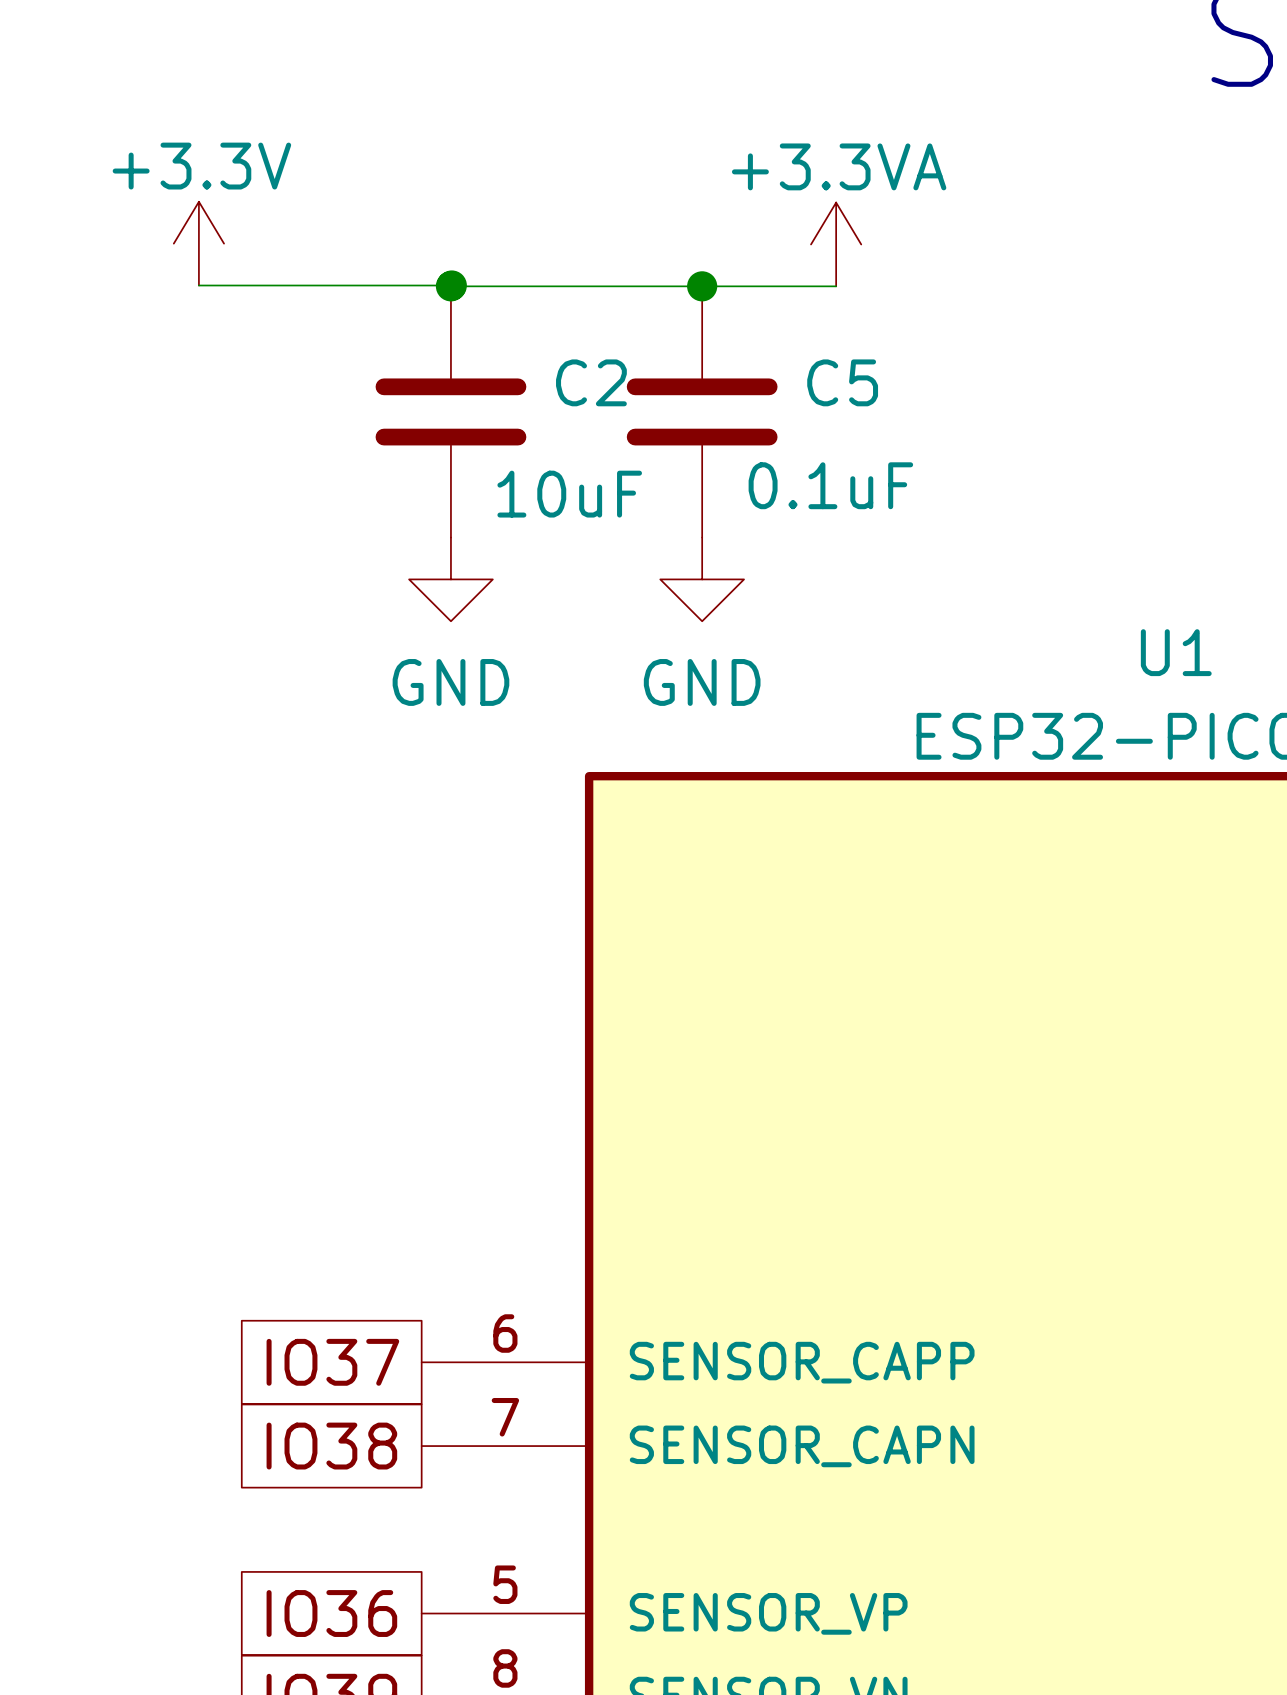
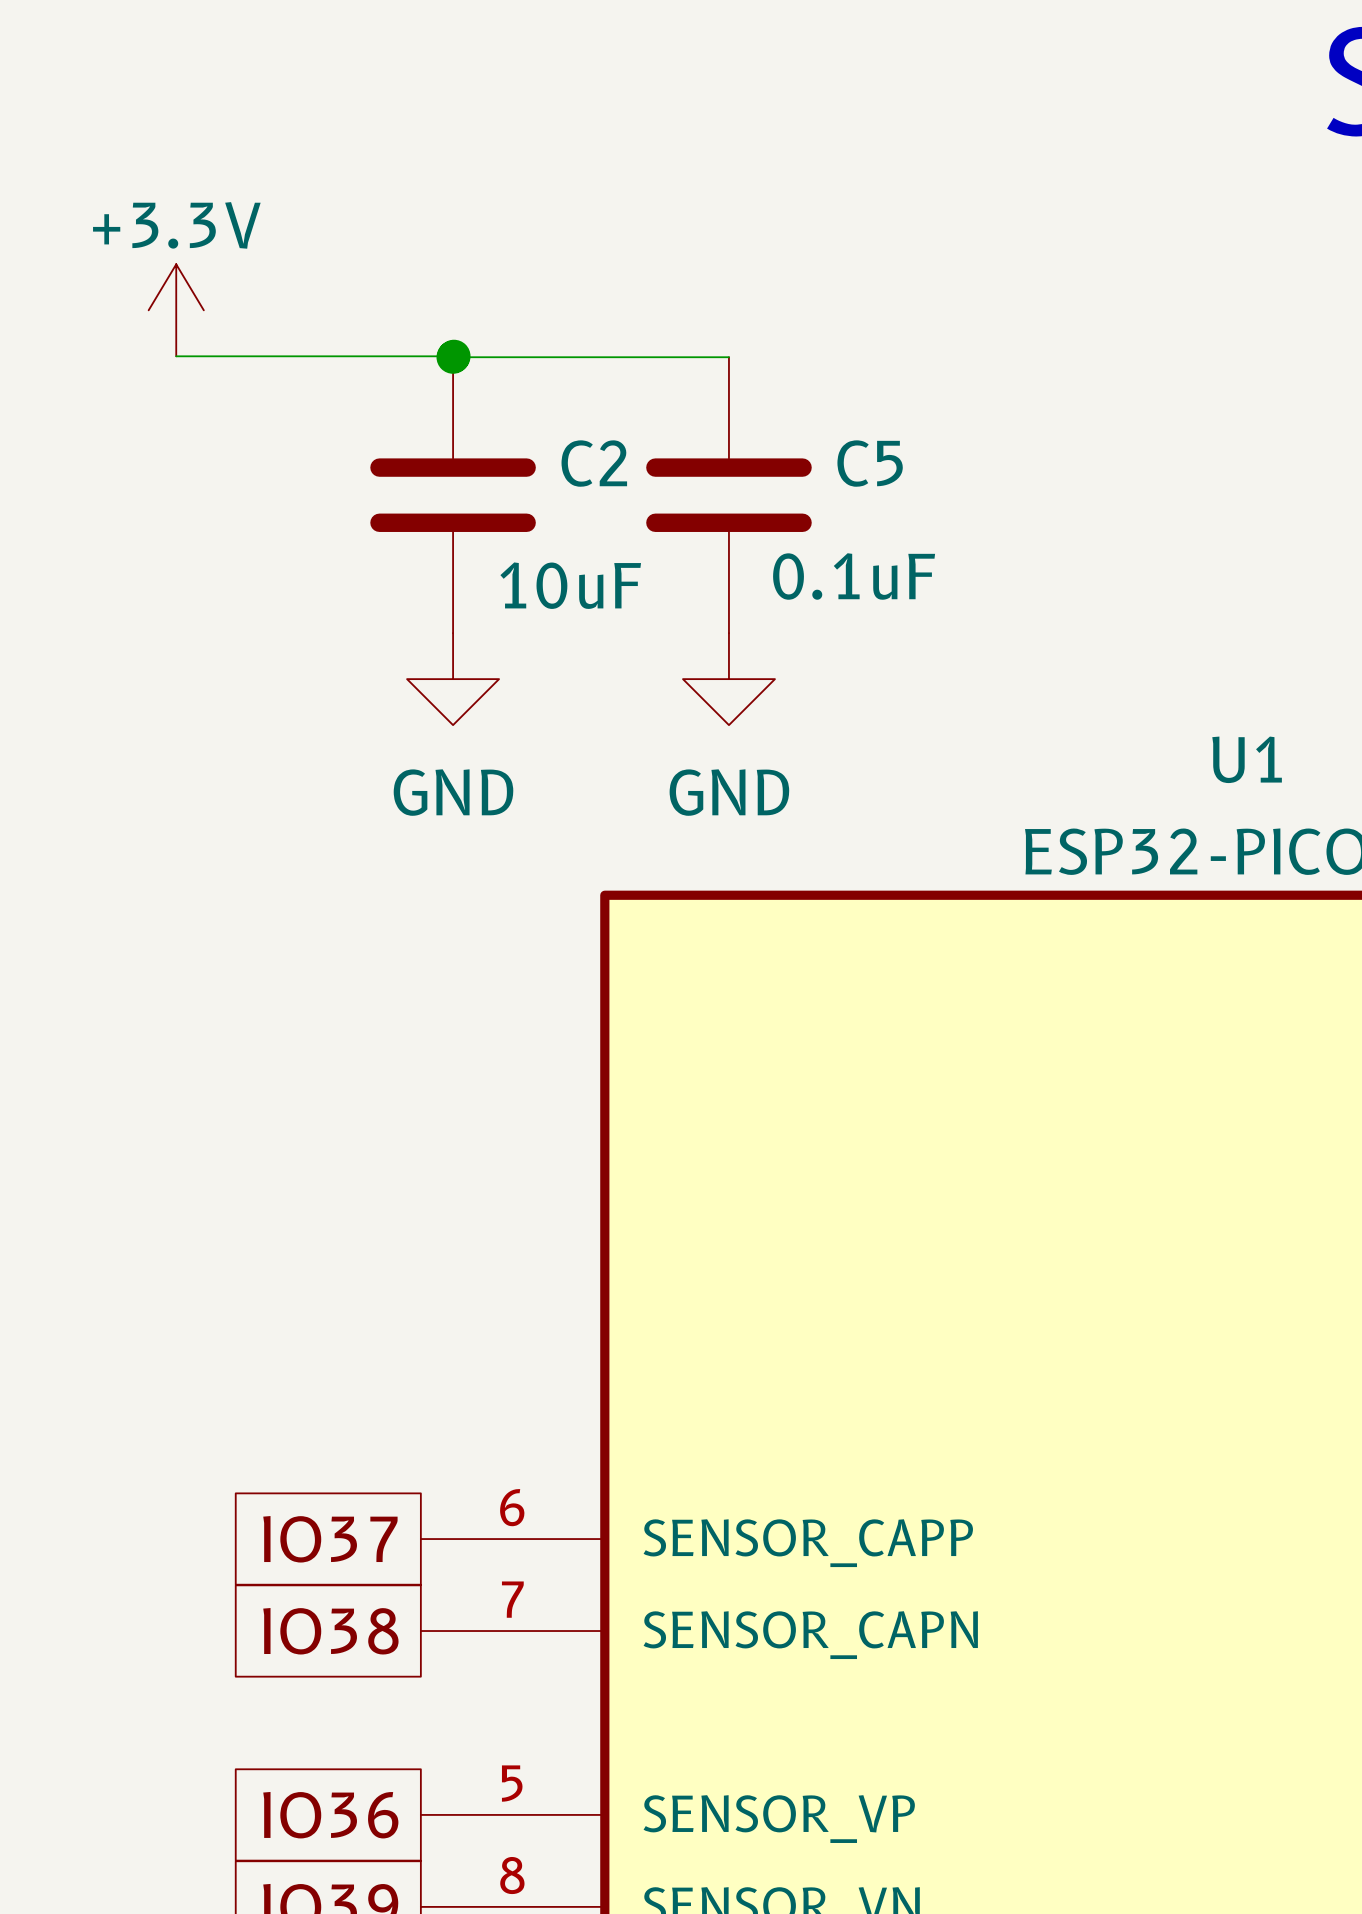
power symbol: +3.3VA (836, 244) -> none
wire: (702, 286) (836, 286) -> none
junction: (702, 286) -> none

